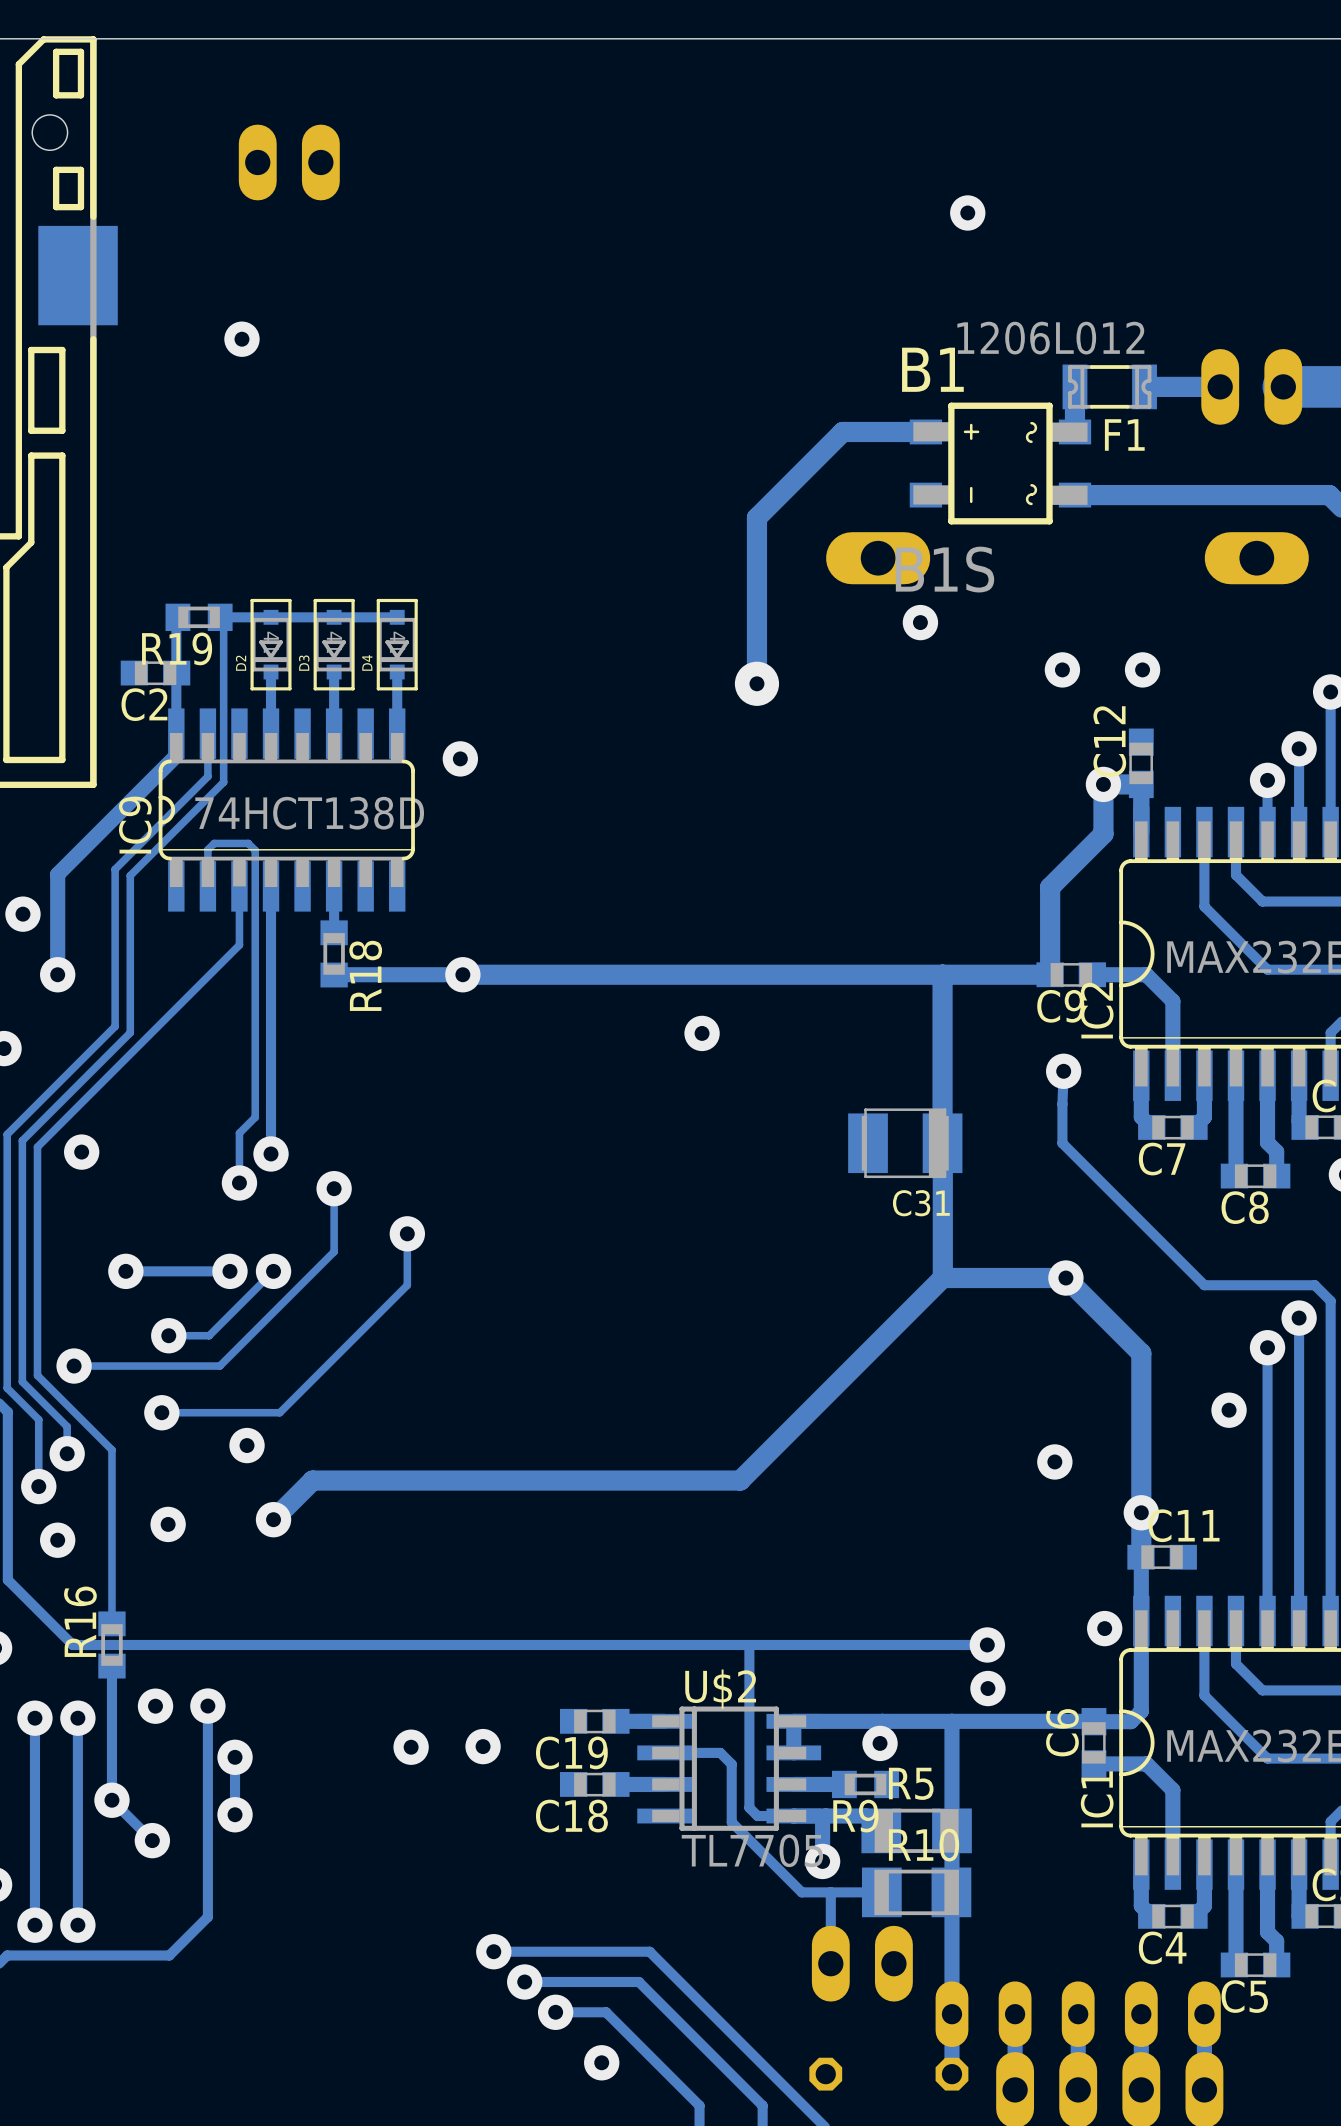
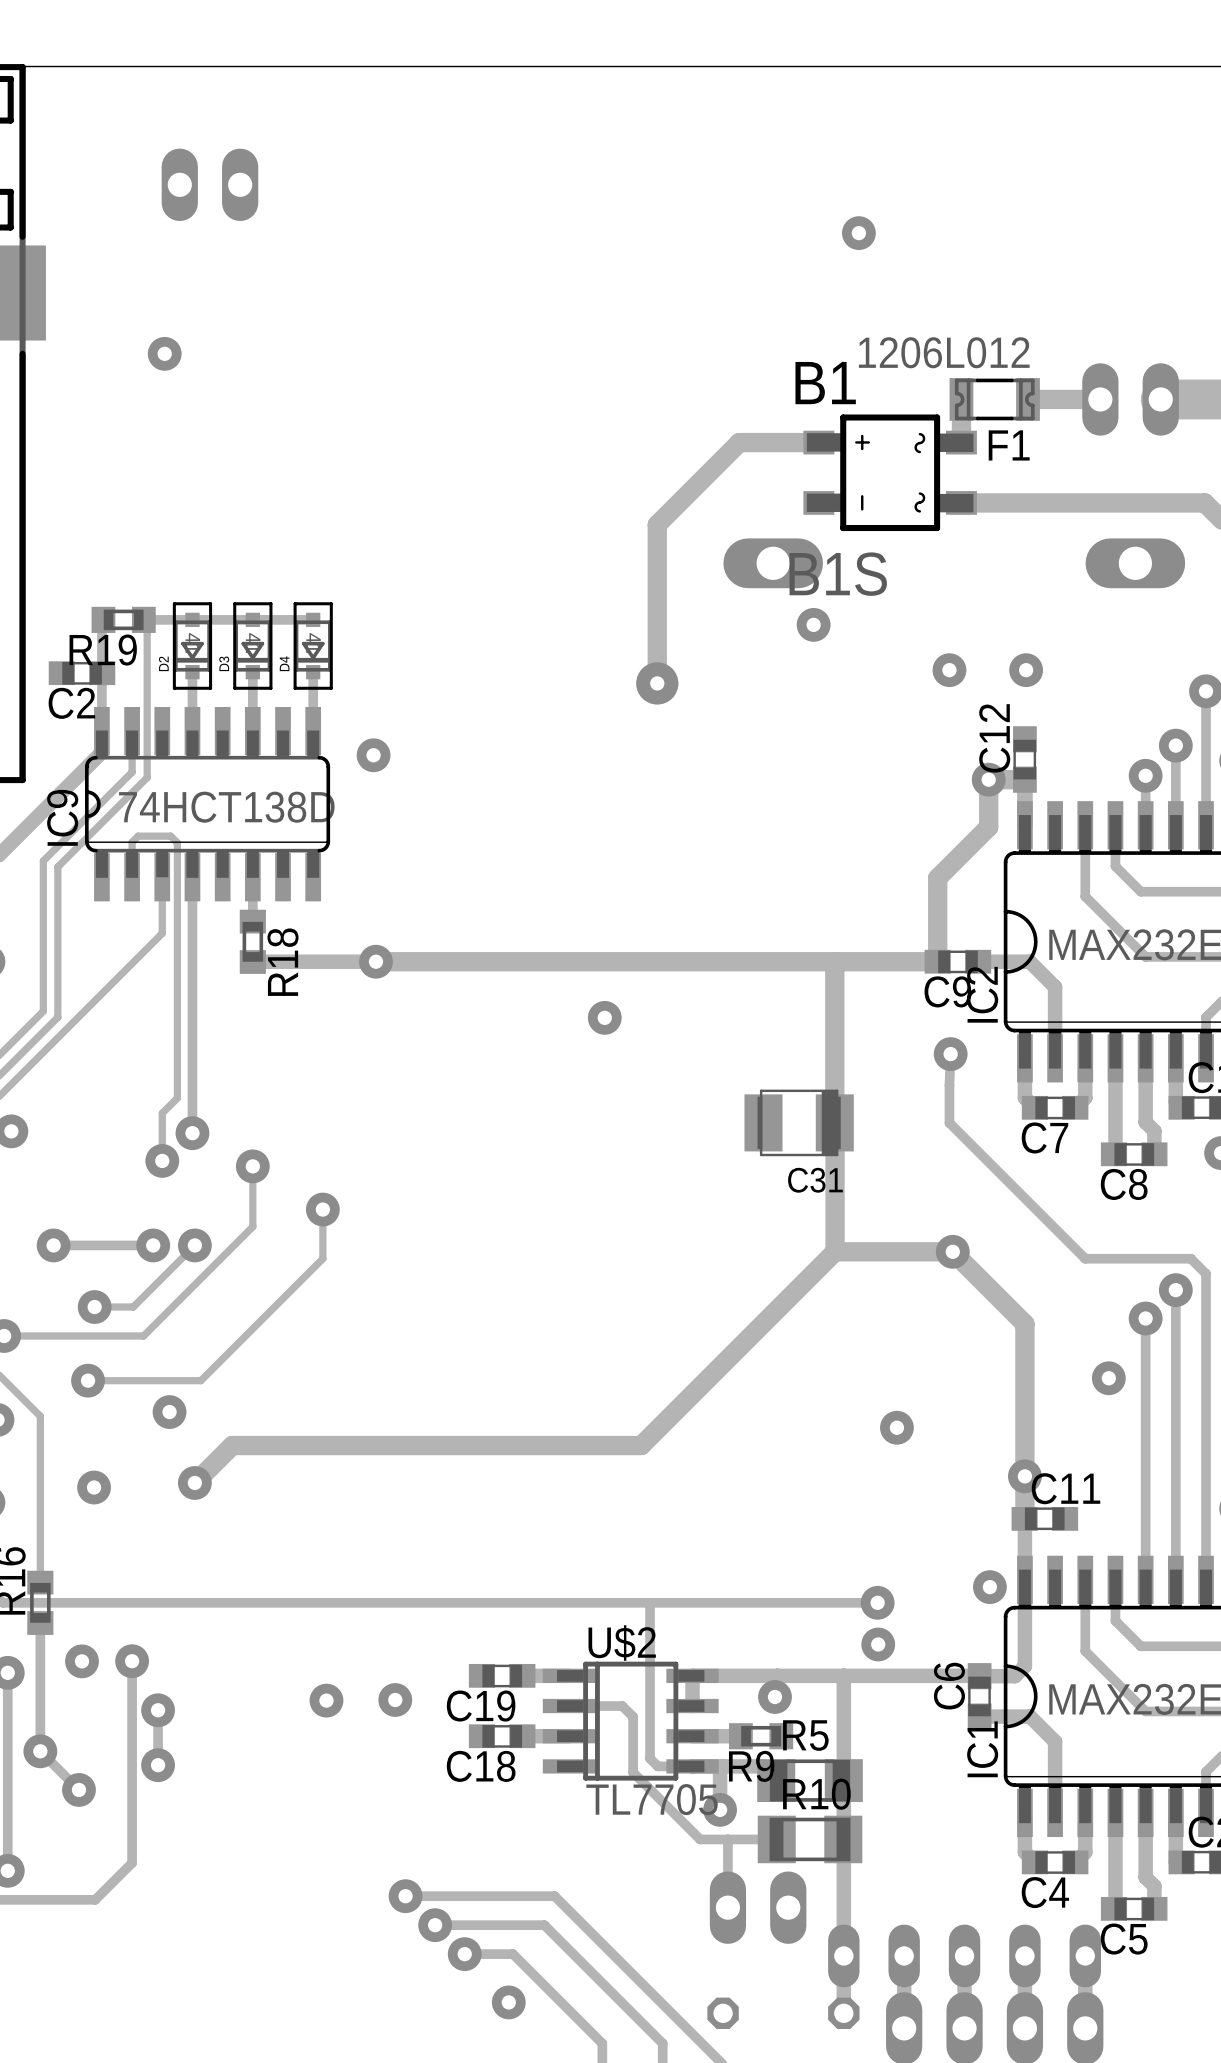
via position: (1054, 1461) -> (896, 1427)

